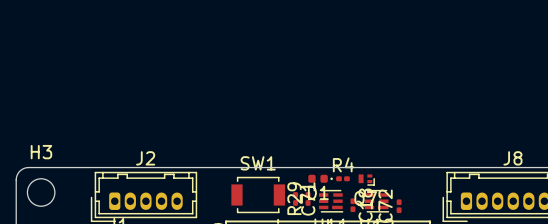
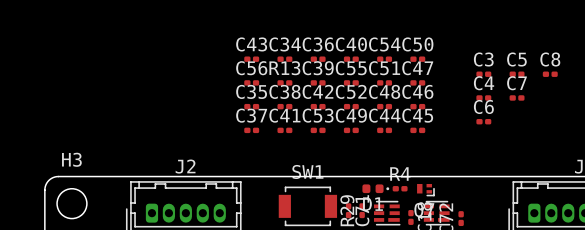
C43: none -> (251, 59)
C34: none -> (284, 59)
C36: none -> (318, 59)
C40: none -> (351, 59)
C54: none -> (384, 59)
C50: none -> (417, 59)
C3: none -> (483, 74)
C5: none -> (517, 74)
C8: none -> (550, 74)
C56: none -> (251, 82)
R13: none -> (284, 82)
C39: none -> (318, 82)
C55: none -> (351, 82)
C51: none -> (384, 82)
C47: none -> (417, 82)
C4: none -> (483, 97)
C7: none -> (517, 97)
C35: none -> (251, 106)
C38: none -> (284, 106)
C42: none -> (318, 106)
C52: none -> (351, 106)
C48: none -> (384, 106)
C46: none -> (417, 106)
C6: none -> (483, 121)
C37: none -> (251, 130)
C41: none -> (284, 130)
C53: none -> (318, 130)
C49: none -> (351, 130)
C44: none -> (384, 130)
C45: none -> (417, 130)

